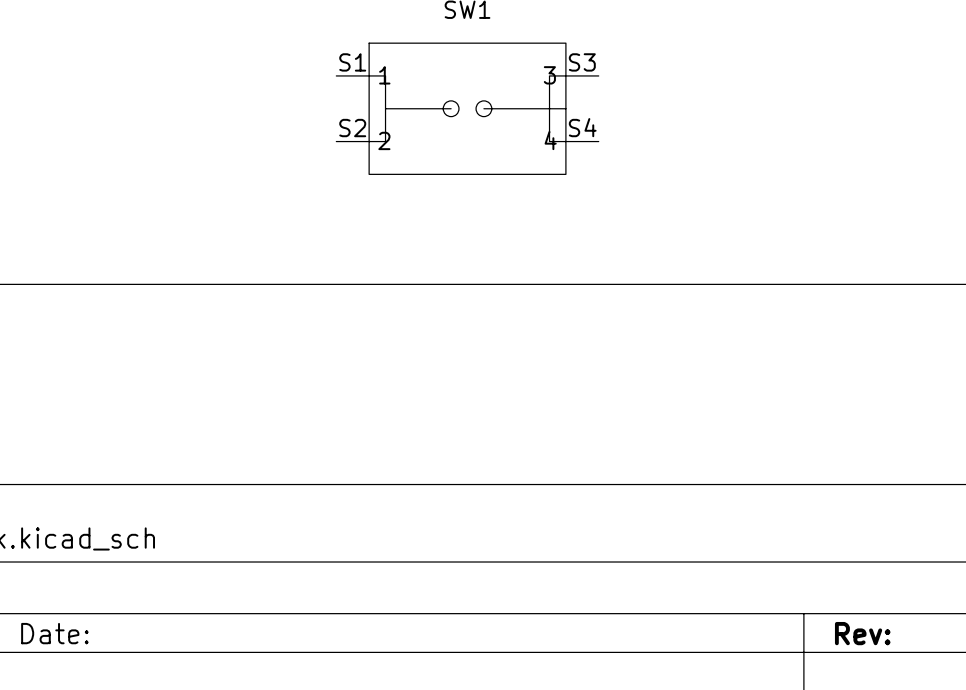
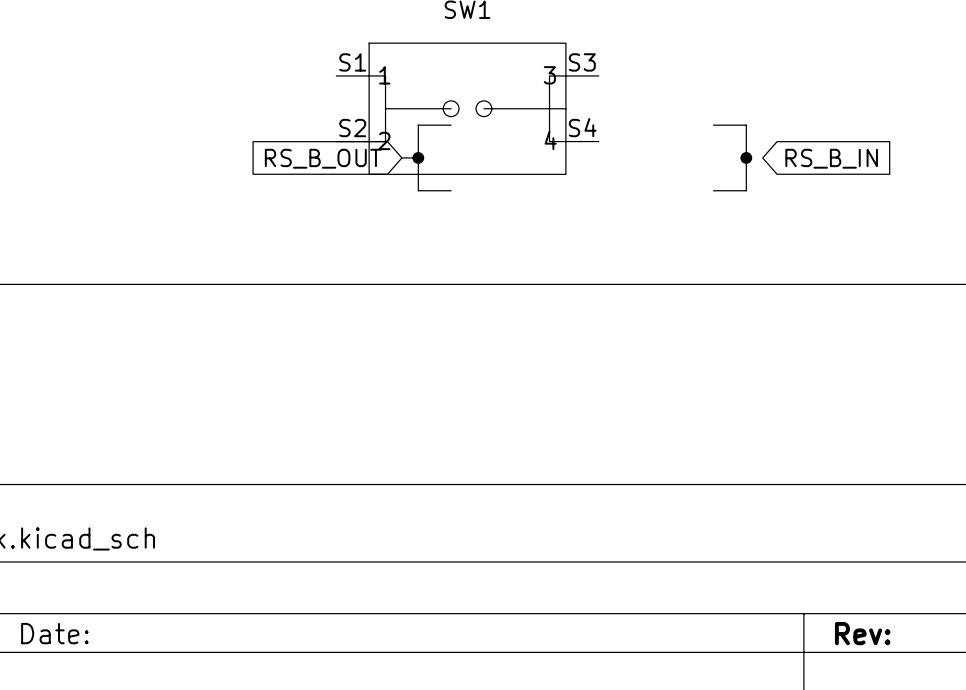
wire: none -> (451, 125) (418, 125) (418, 190) (451, 190)
wire: none -> (713, 125) (746, 125) (746, 190) (713, 190)
wire: none -> (401, 157) (418, 157)
junction: none -> (418, 157)
junction: none -> (746, 157)
global label: none -> RS_B_OUT (323, 158)
global label: none -> RS_B_IN (831, 158)

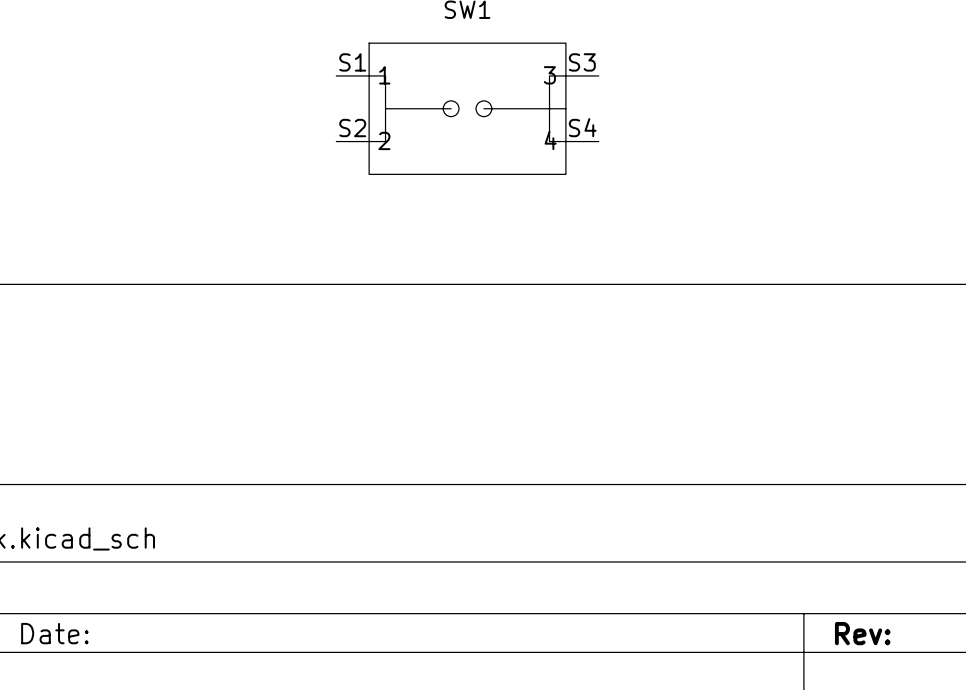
wire: (451, 125) (418, 125) (418, 190) (451, 190) -> none
wire: (713, 125) (746, 125) (746, 190) (713, 190) -> none
wire: (401, 157) (418, 157) -> none
junction: (418, 157) -> none
junction: (746, 157) -> none
global label: RS_B_OUT (323, 158) -> none
global label: RS_B_IN (831, 158) -> none

